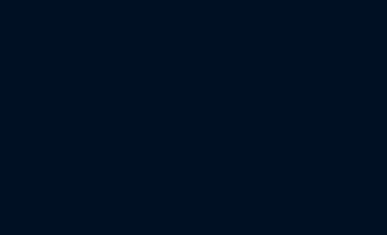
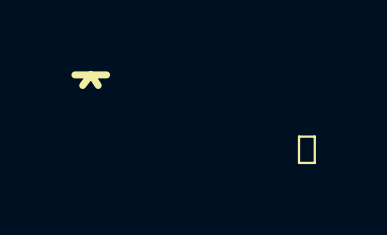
part: none -> (90, 80)
part: none -> (306, 149)

